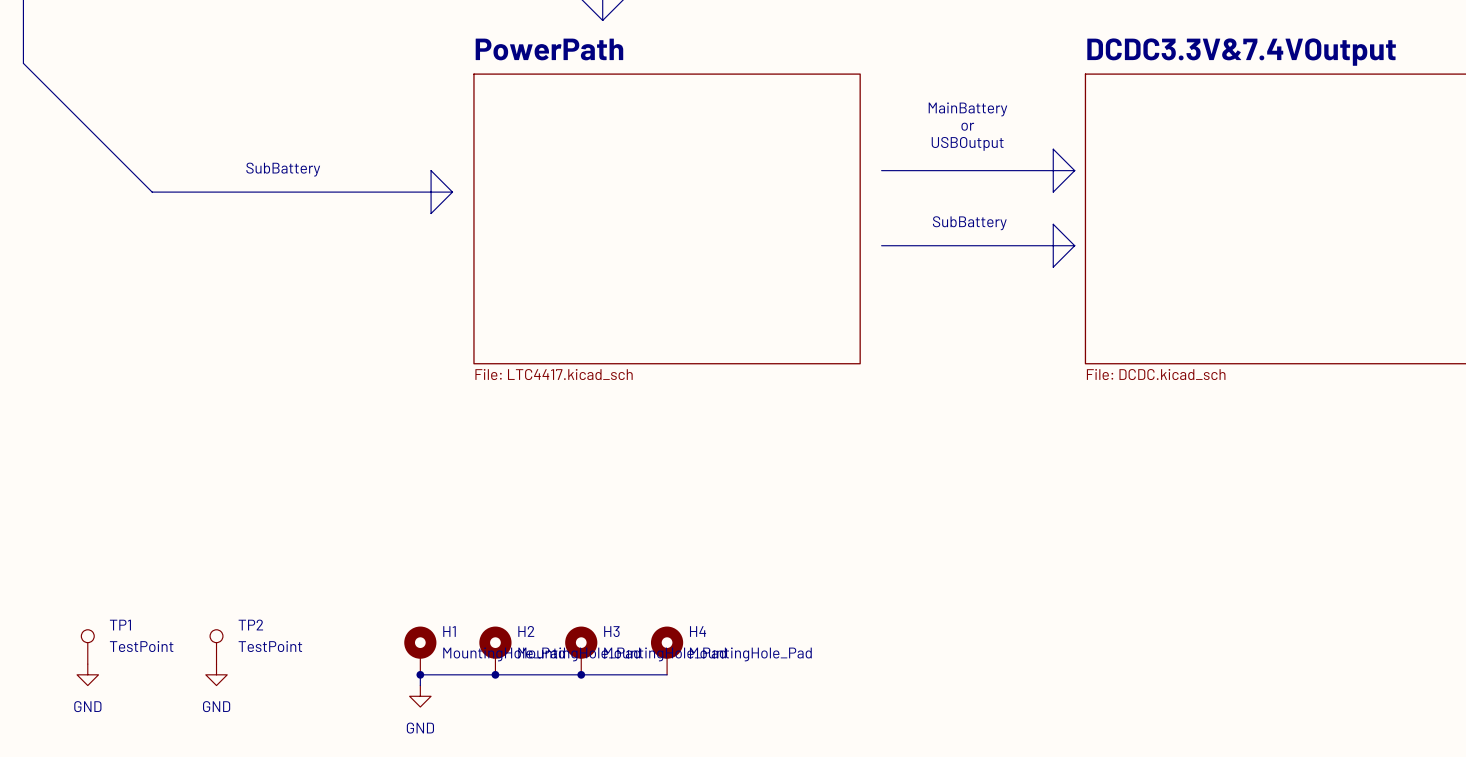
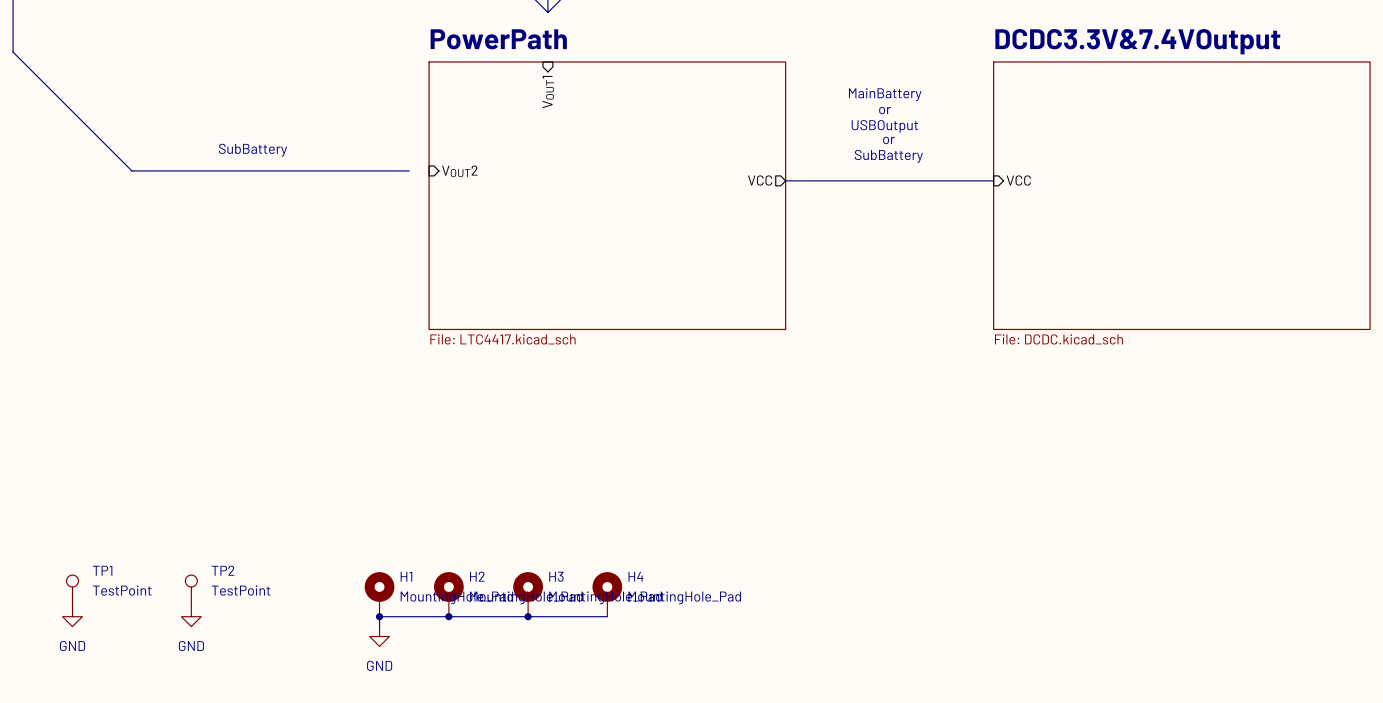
sheet pin: none -> VOUT1 (548, 92)
text: none -> or (888, 140)
line: (431, 170) (431, 213) (452, 192) (431, 170) -> none
line: (881, 170) (1074, 170) -> none
line: (1074, 170) (1053, 149) (1053, 192) (1074, 170) -> none
sheet pin: none -> VOUT2 (459, 171)
sheet pin: none -> VCC (760, 180)
wire: none -> (785, 180) (993, 180)
sheet pin: none -> VCC (1018, 180)
text position: SubBattery (969, 223) -> SubBattery (888, 156)
line: (881, 245) (1074, 245) -> none
line: (1074, 245) (1053, 224) (1053, 267) (1074, 245) -> none

